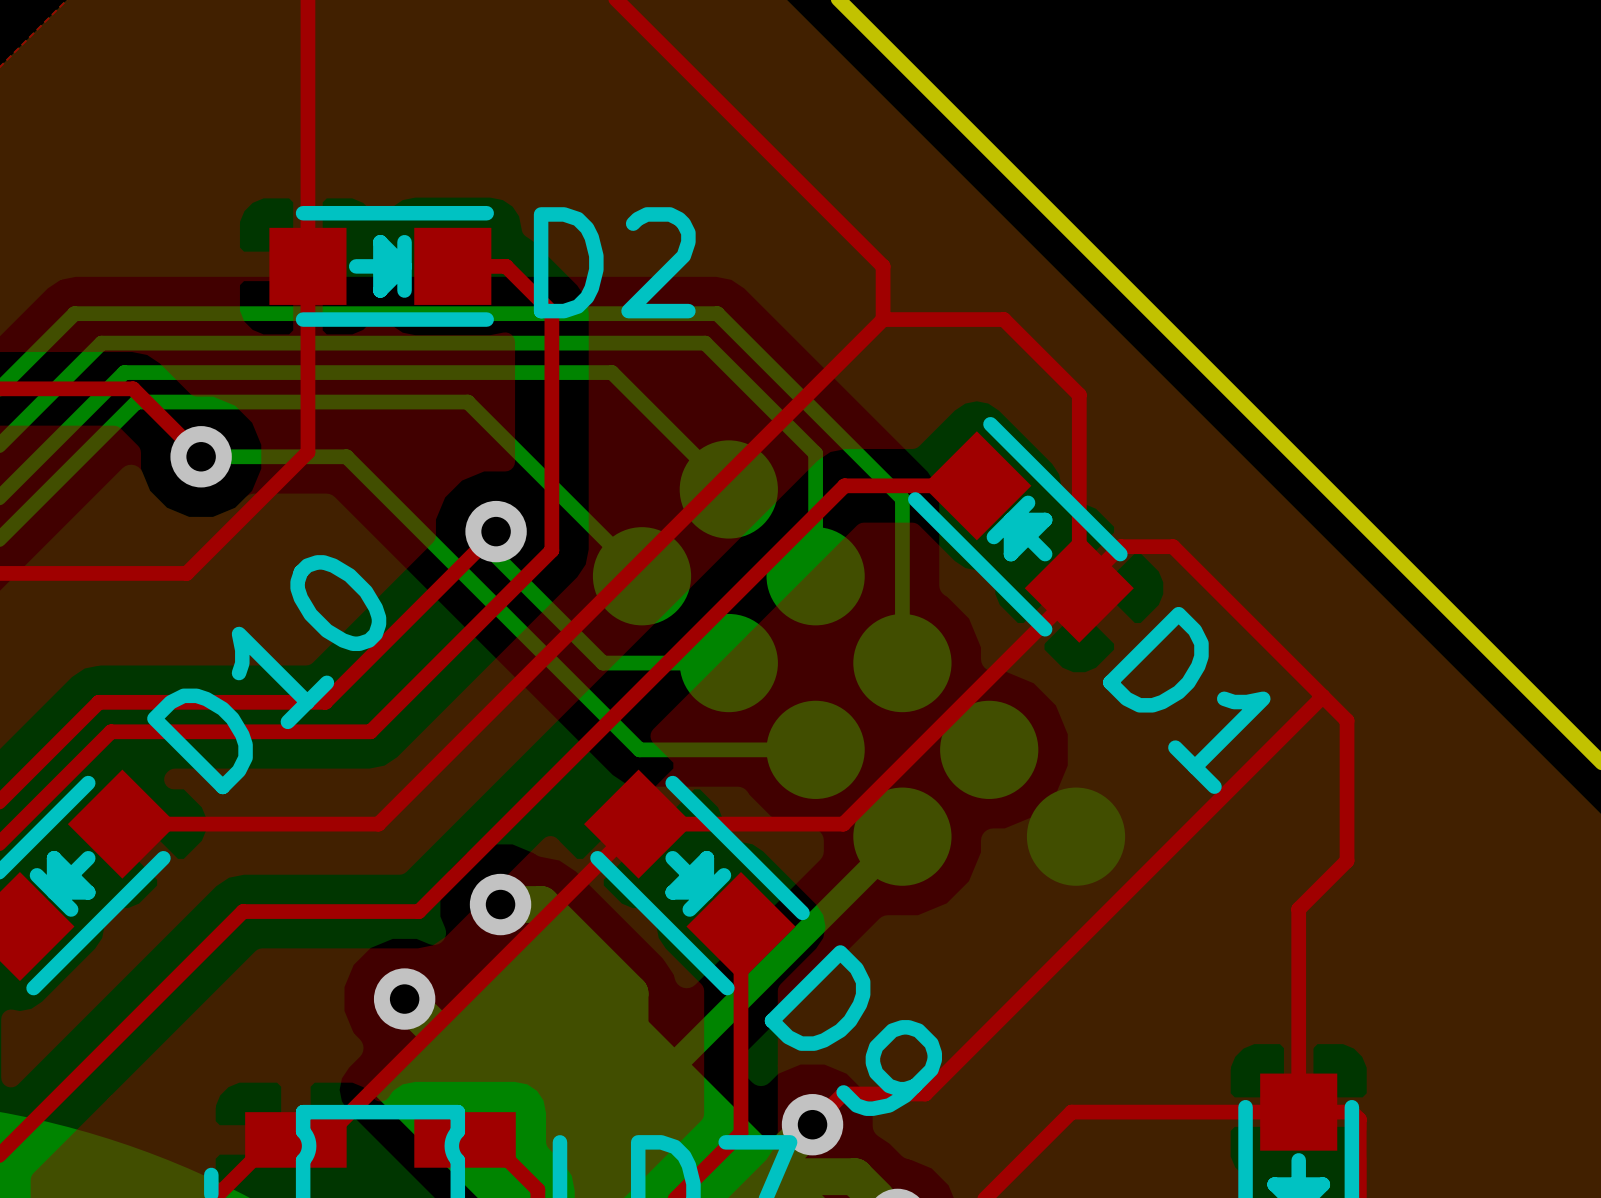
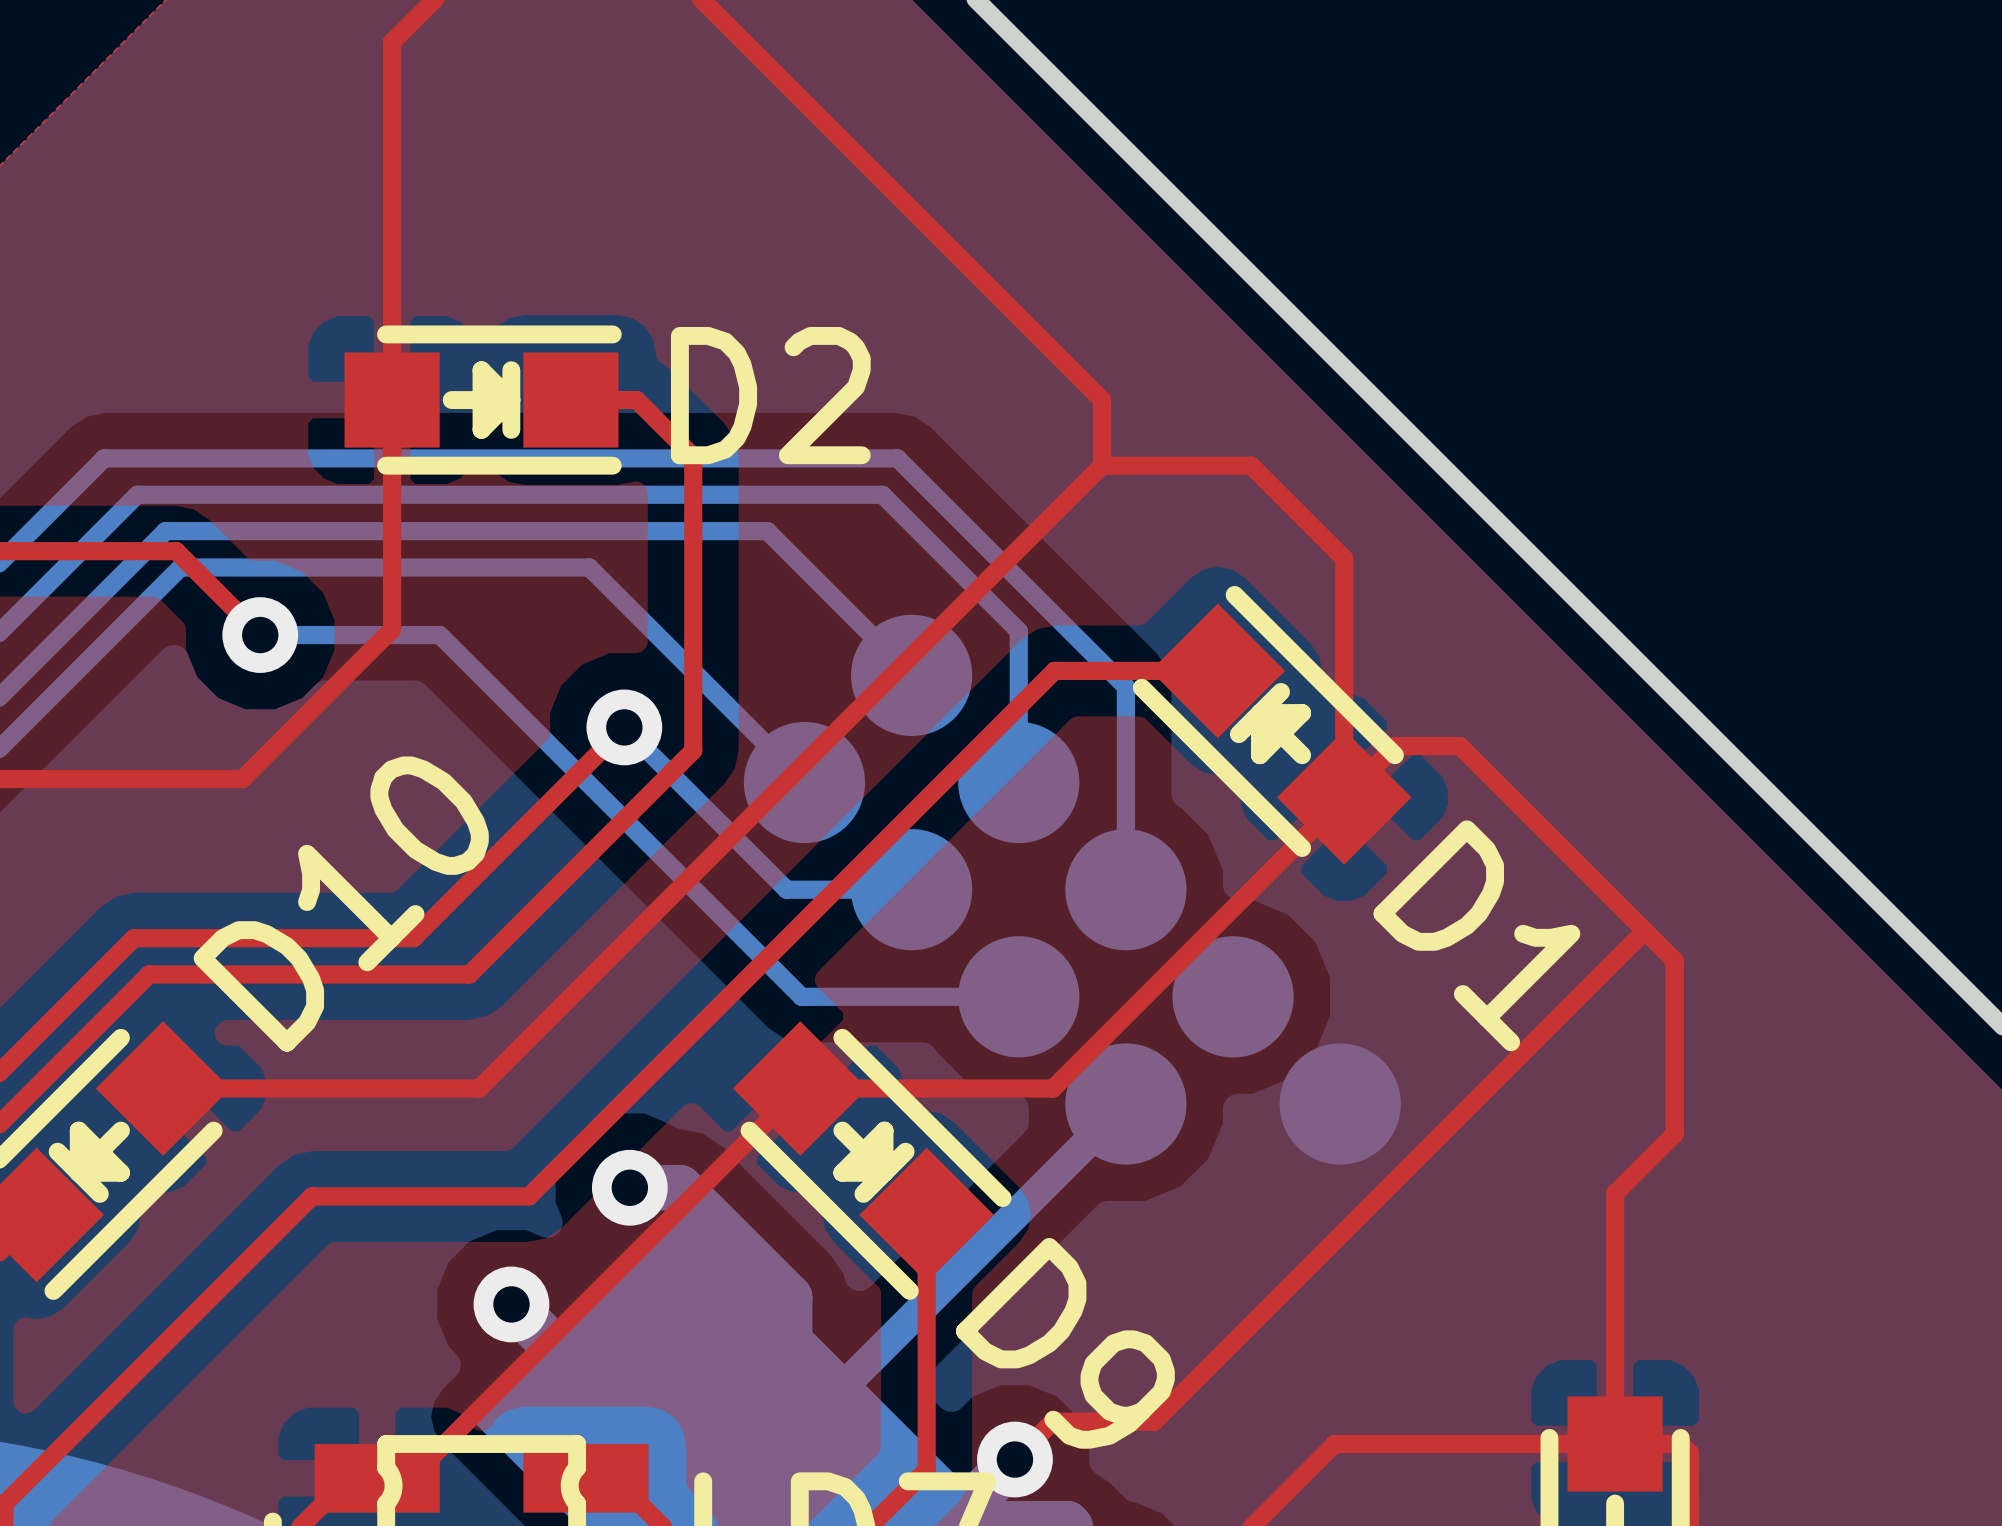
bottom track: (496, 531) (496, 556) (603, 663) (627, 663) -> (624, 727) (786, 889)

